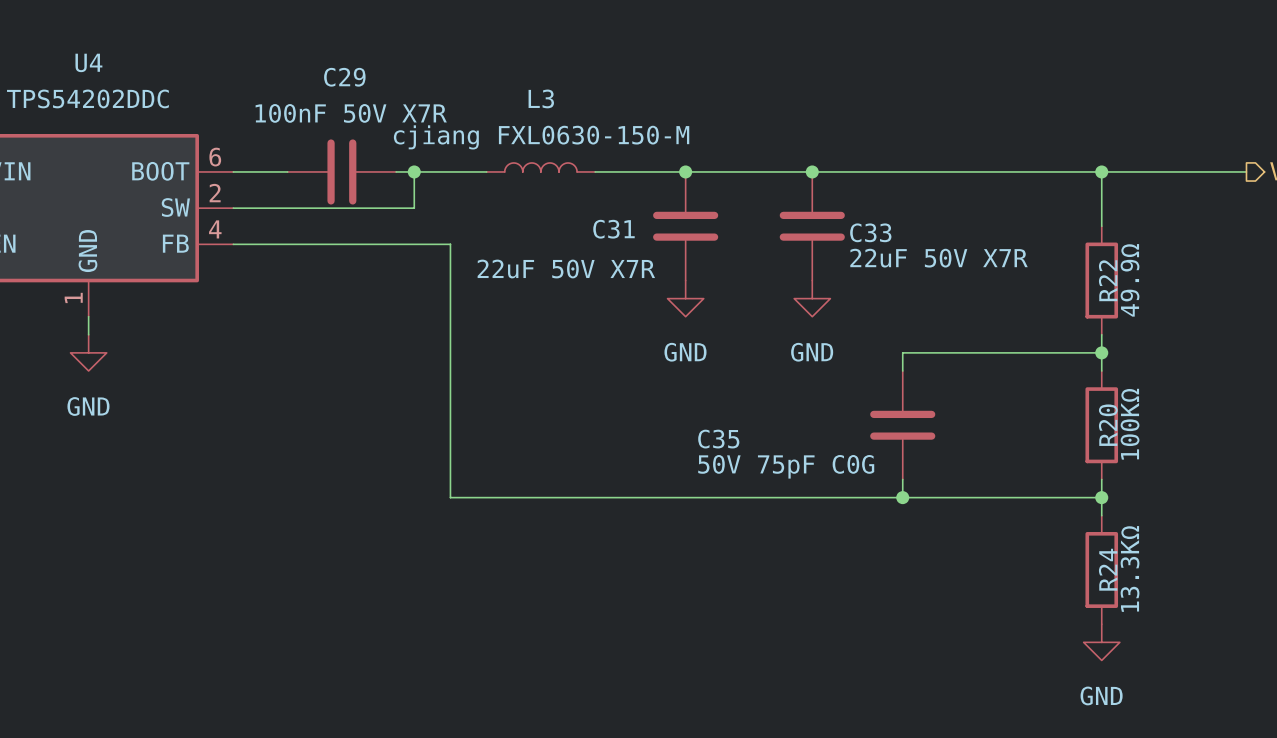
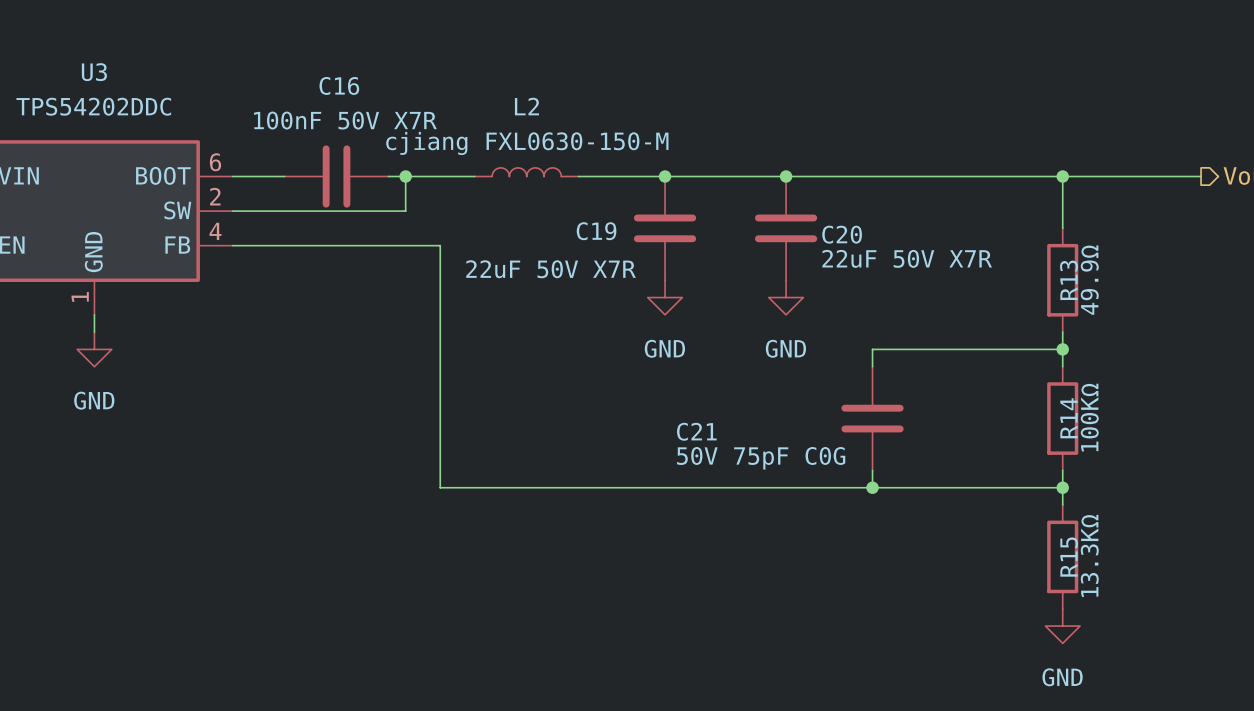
U4 name: U4 (88, 62) -> U3 (94, 72)
C29 name: C29 (344, 77) -> C16 (339, 85)
L3 name: L3 (541, 98) -> L2 (526, 106)
C31 name: C31 (613, 229) -> C19 (596, 231)
C33 name: C33 (870, 232) -> C20 (842, 234)
R22 name: R22 (1108, 280) -> R13 (1069, 280)
R20 name: R20 (1108, 425) -> R14 (1068, 418)
C35 name: C35 (718, 439) -> C21 (696, 431)
R24 name: R24 (1108, 569) -> R15 (1069, 557)

